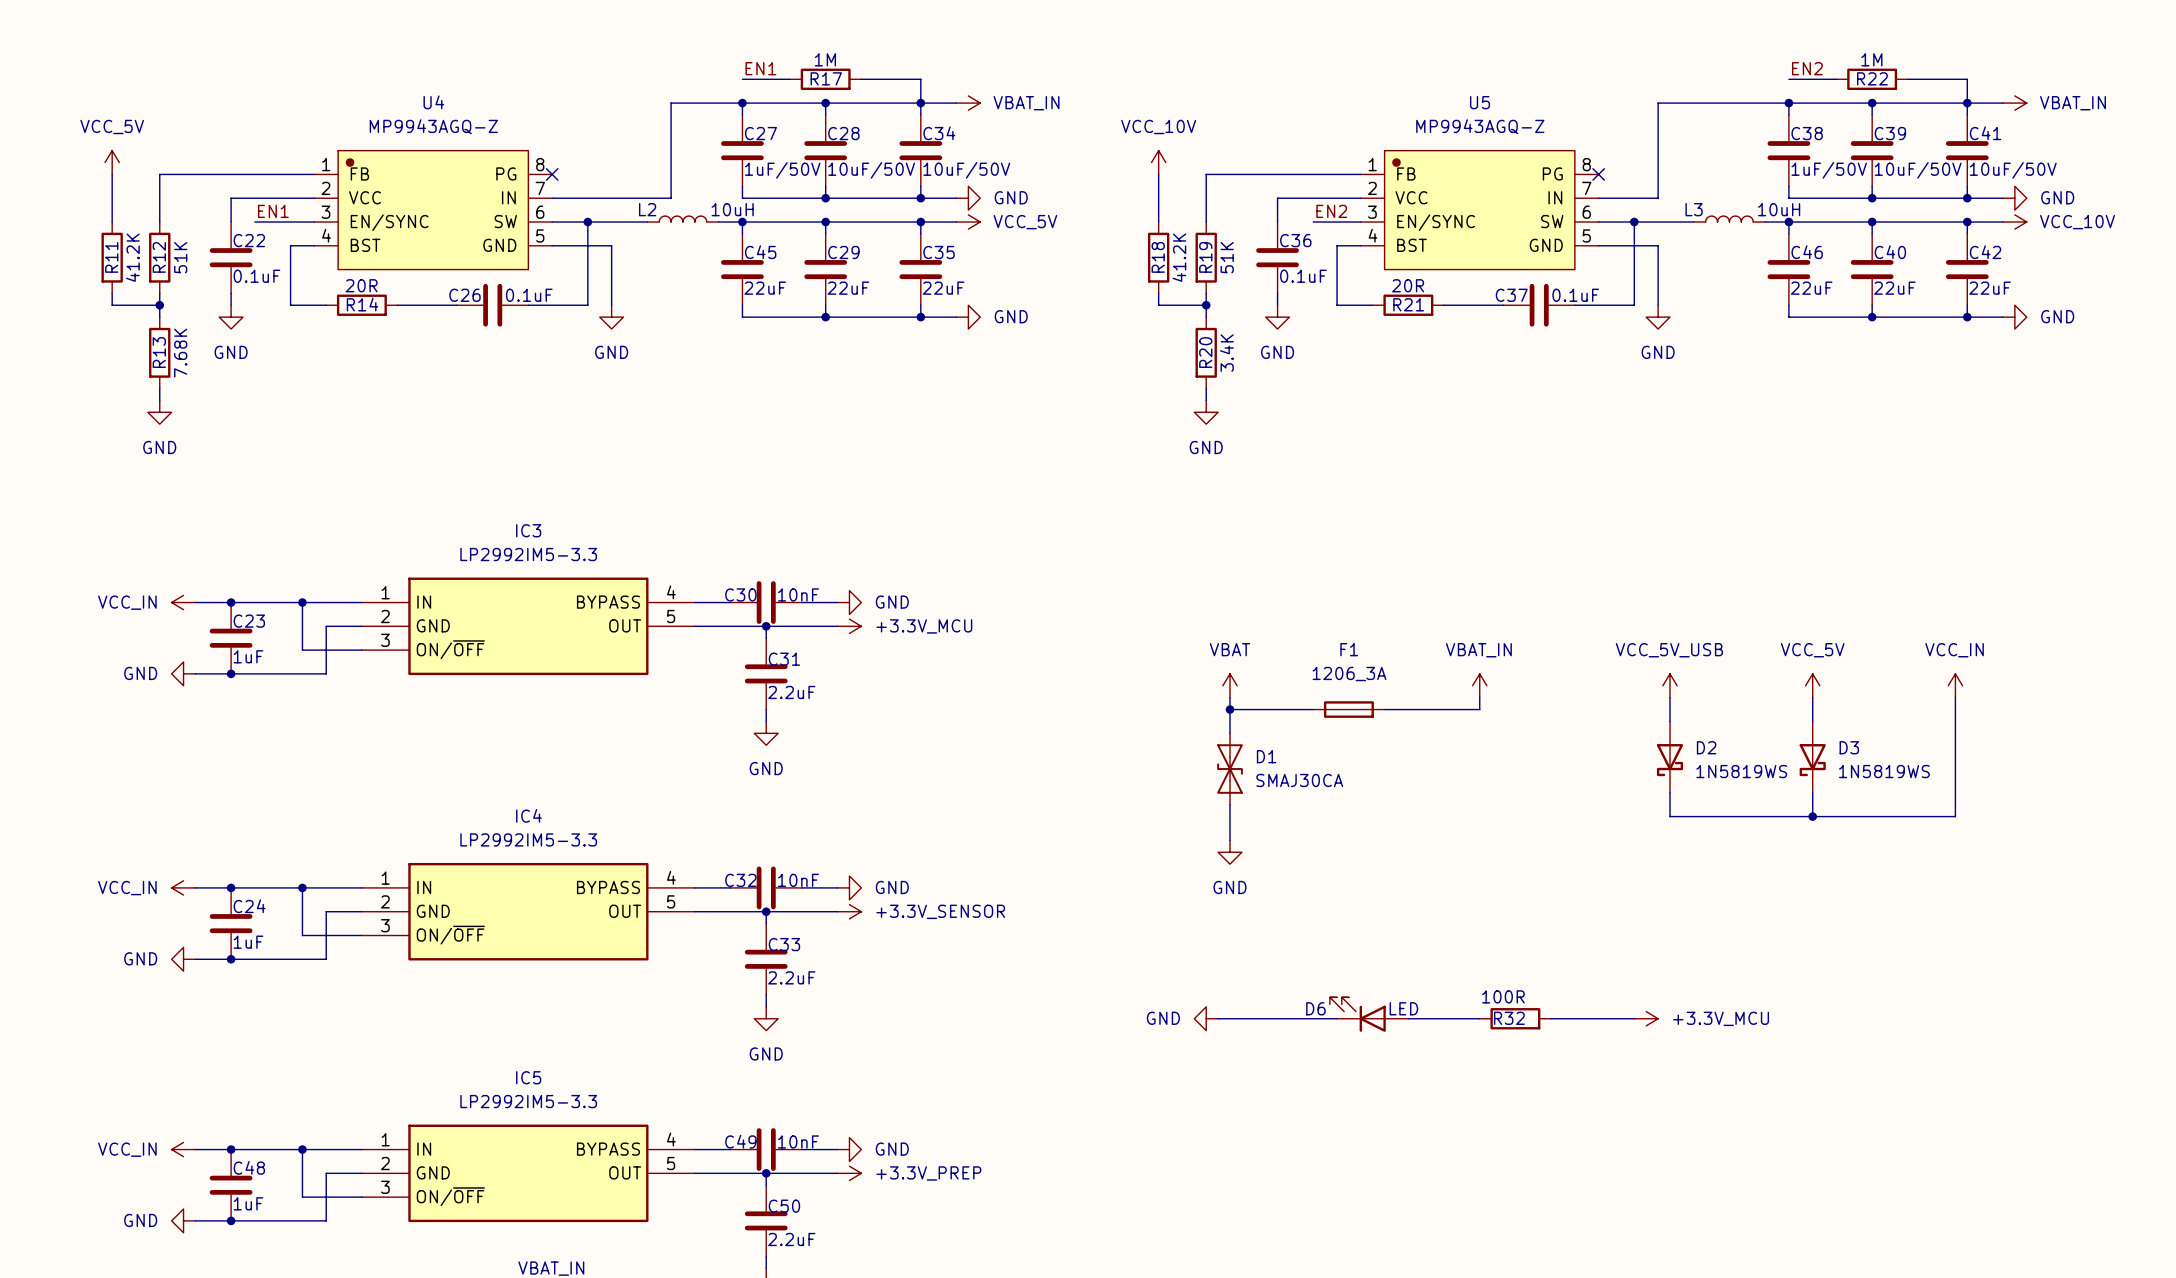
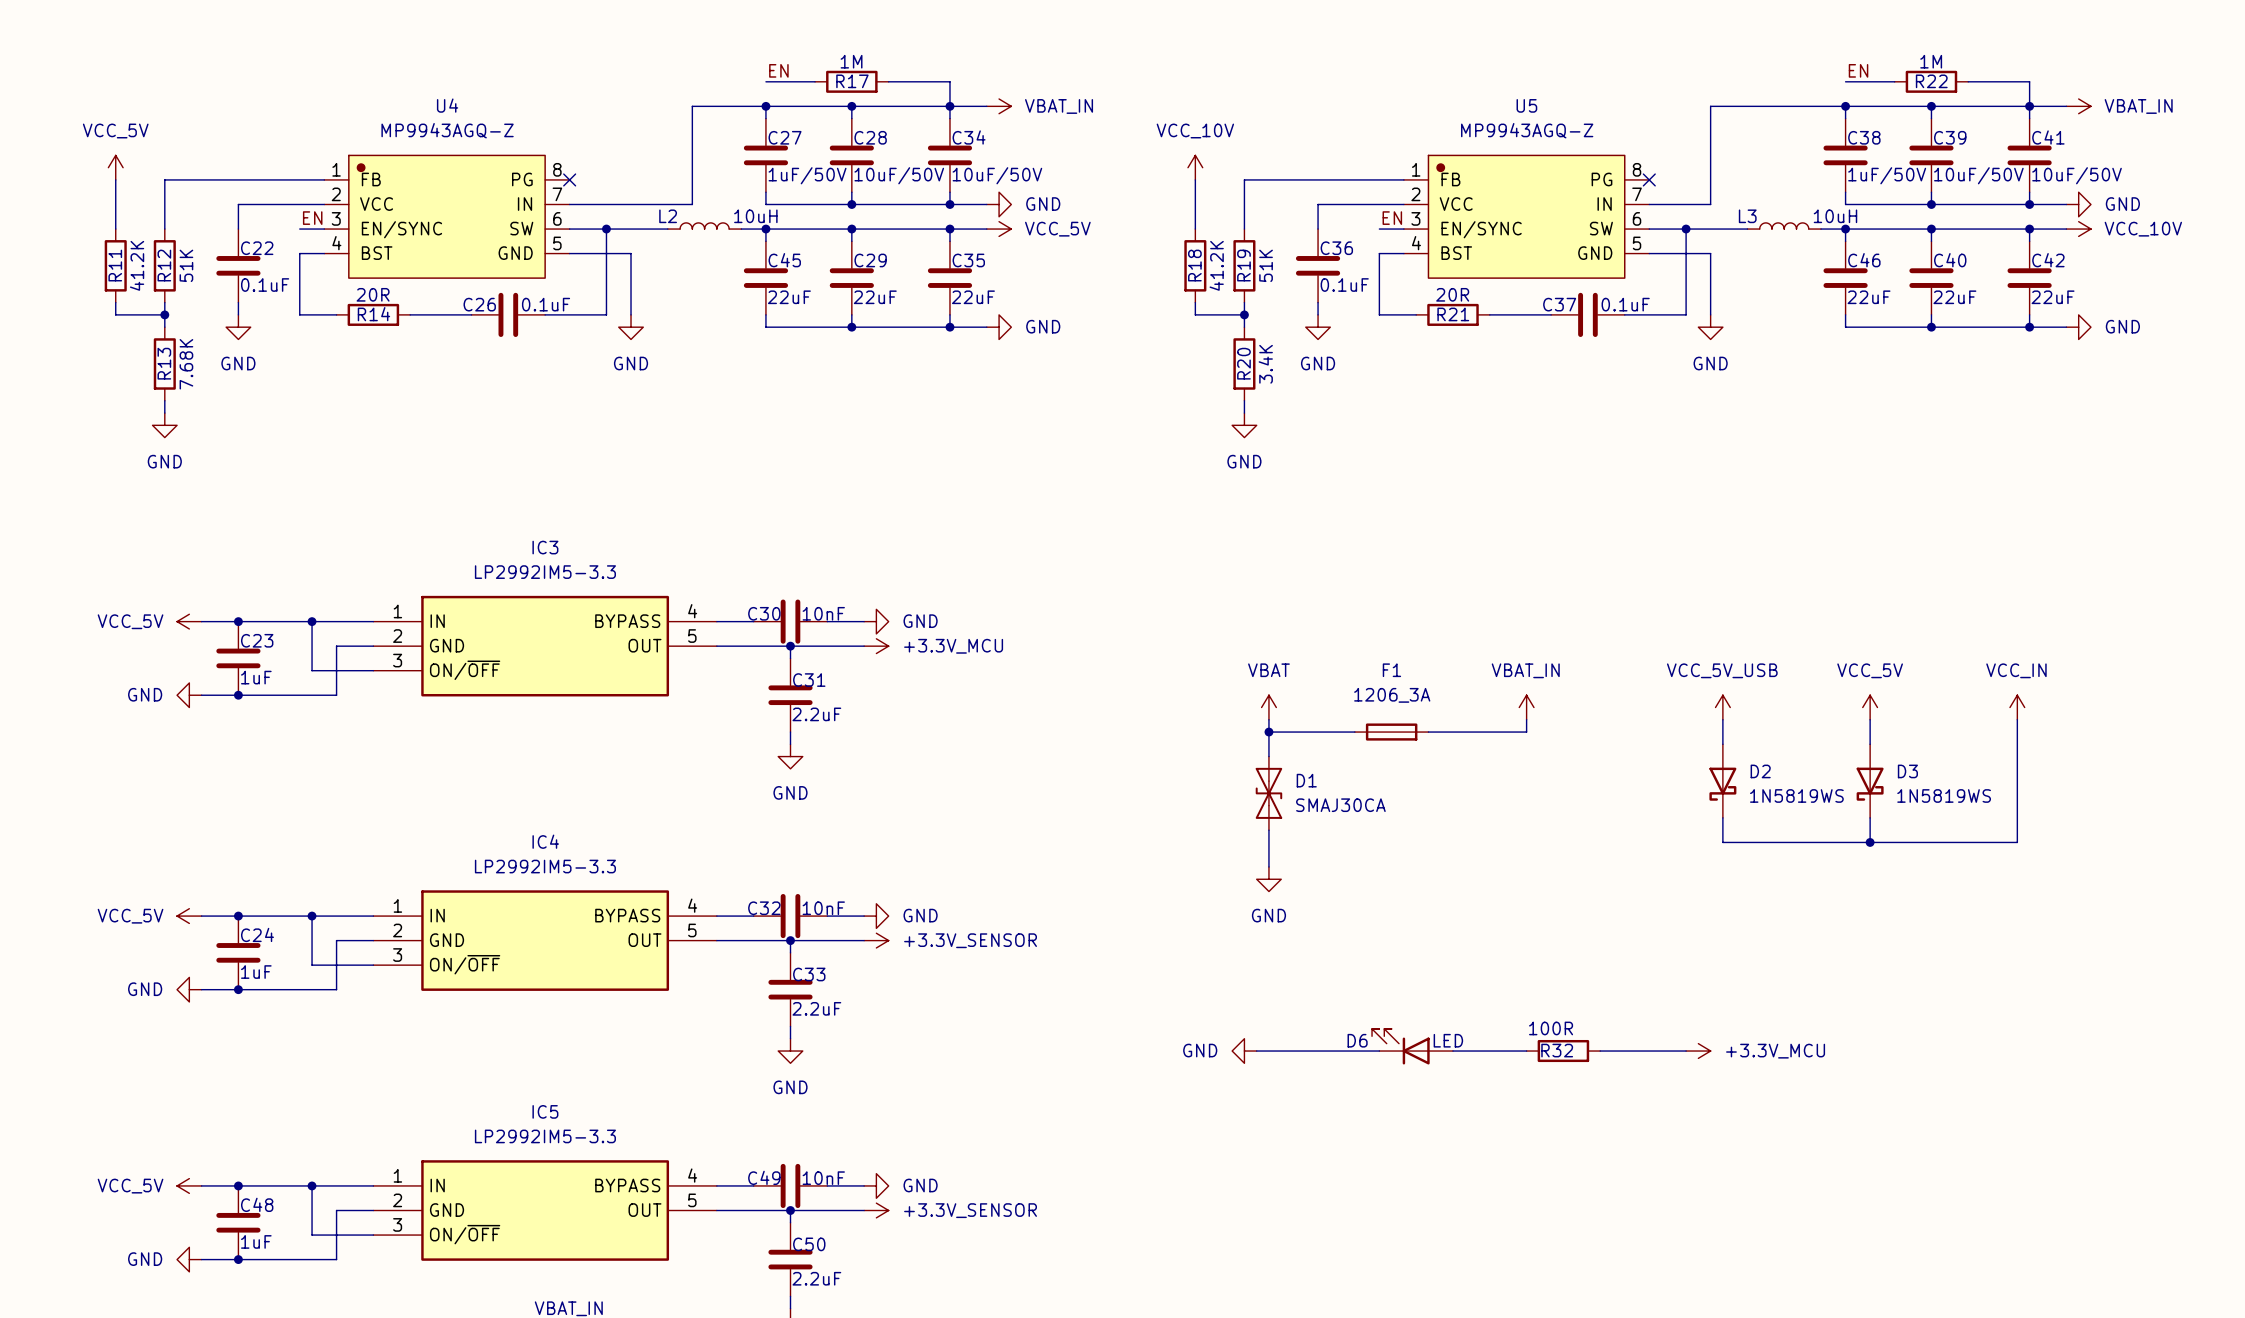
label: EN1 (760, 68) -> EN (778, 70)
label: EN2 (1807, 68) -> EN (1858, 70)
label: EN1 (273, 211) -> EN (312, 218)
label: EN2 (1331, 211) -> EN (1392, 218)
wire: (254, 222) (290, 222) -> none
wire: (1313, 222) (1337, 222) -> none
power symbol: VCC_IN (183, 602) -> VCC_5V (189, 621)
power symbol: VCC_IN (183, 887) -> VCC_5V (189, 916)
power symbol: VCC_IN (183, 1149) -> VCC_5V (189, 1185)
power symbol: +3.3V_PREP (849, 1173) -> +3.3V_SENSOR (876, 1210)

